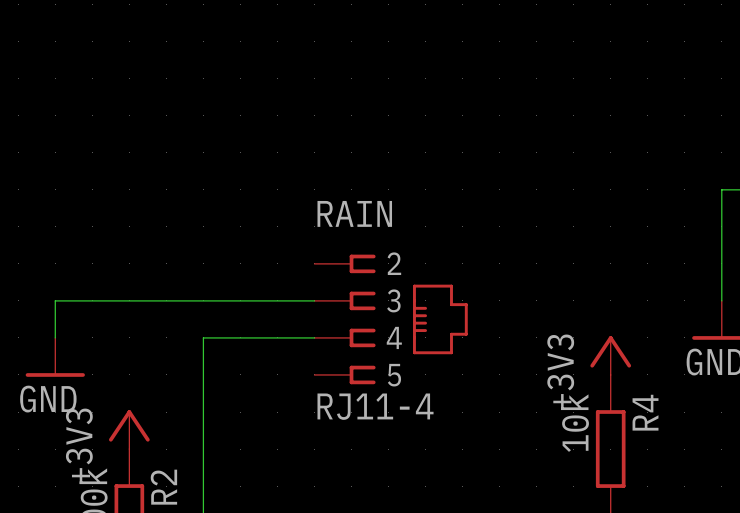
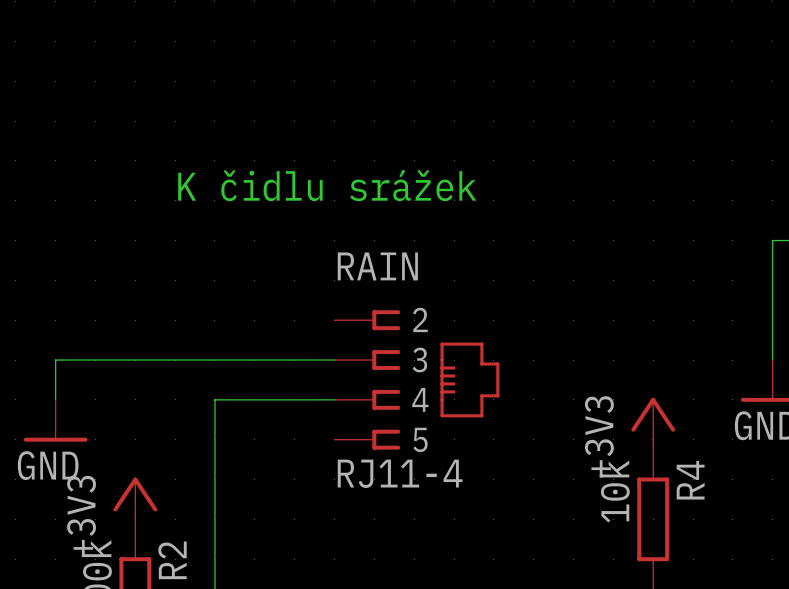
text: none -> K čidlu srážek (327, 185)

